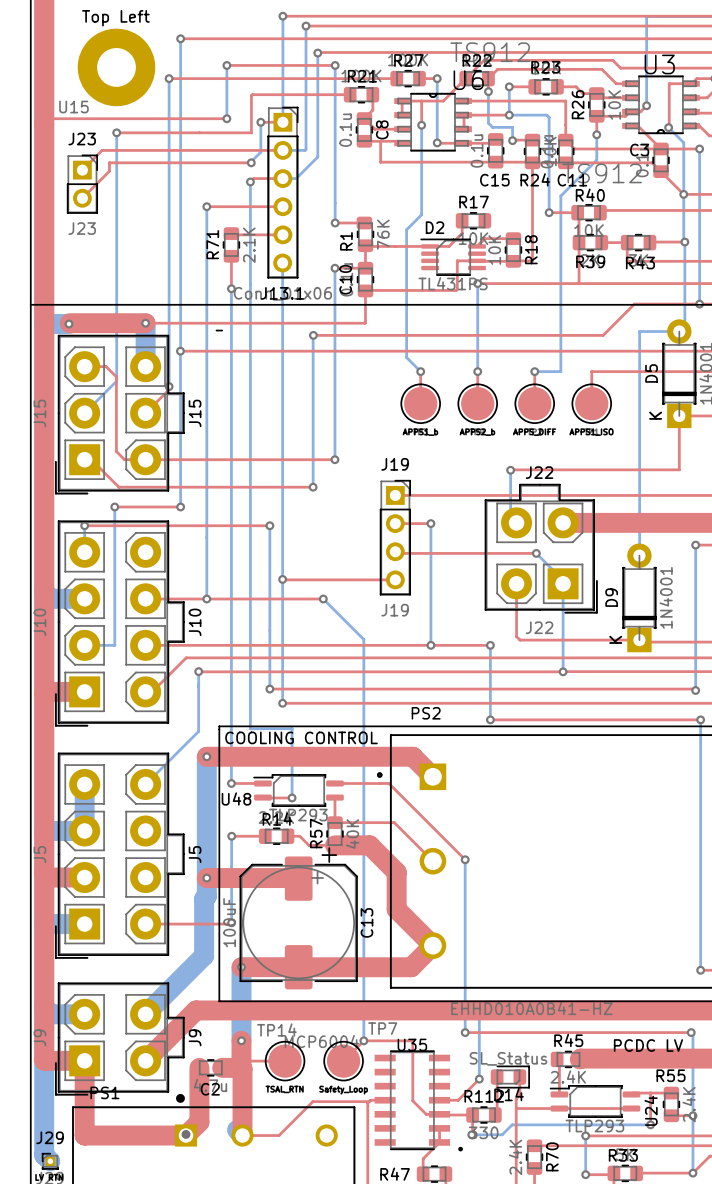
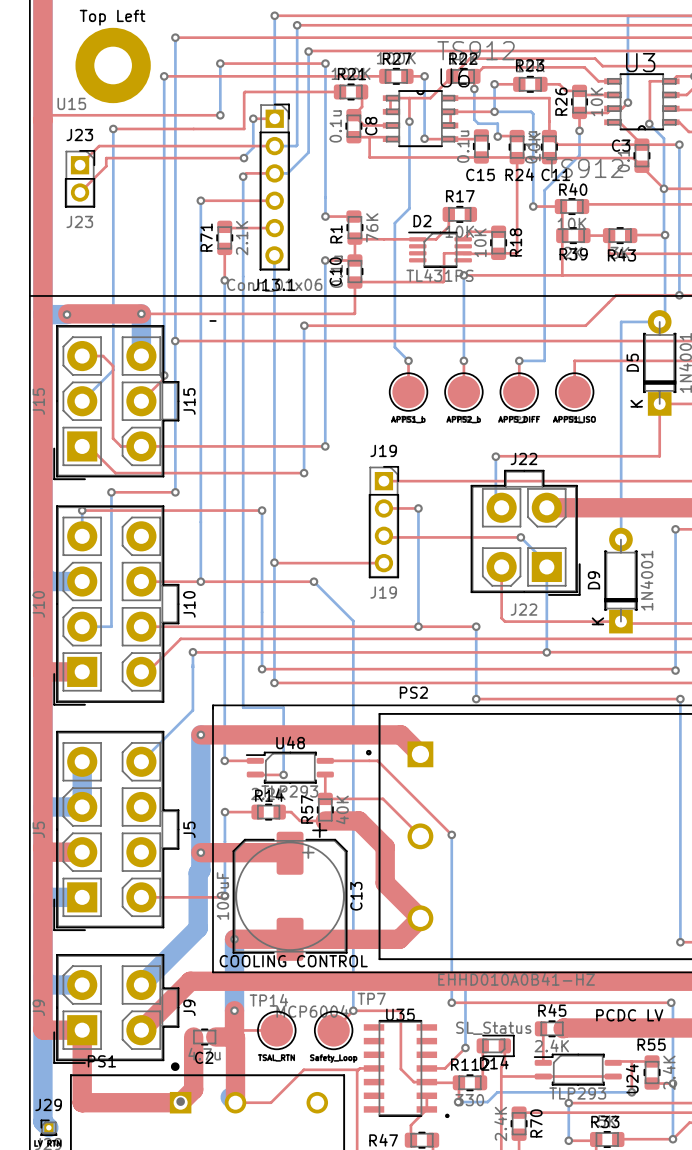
text position: COOLING CONTROL (301, 737) -> COOLING CONTROL (293, 961)
U48 name position: U48 (236, 798) -> U48 (290, 742)

